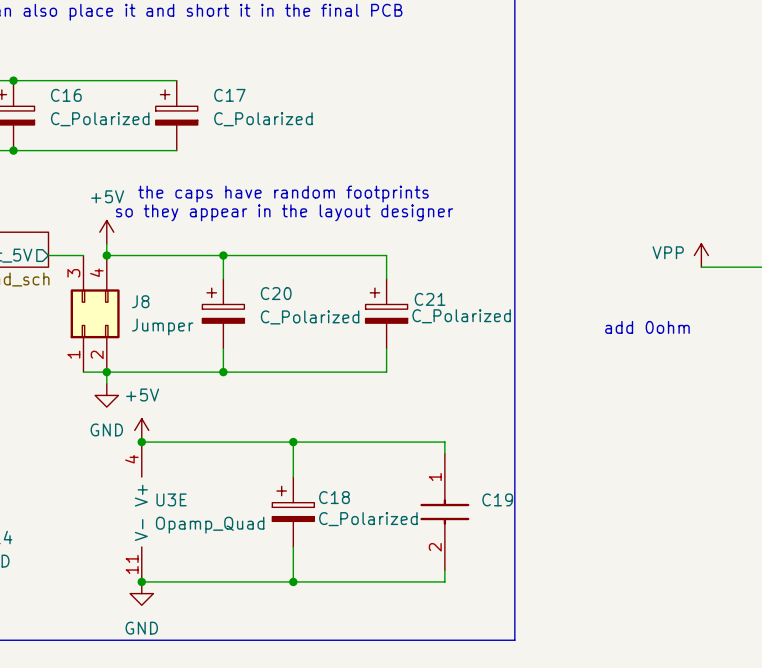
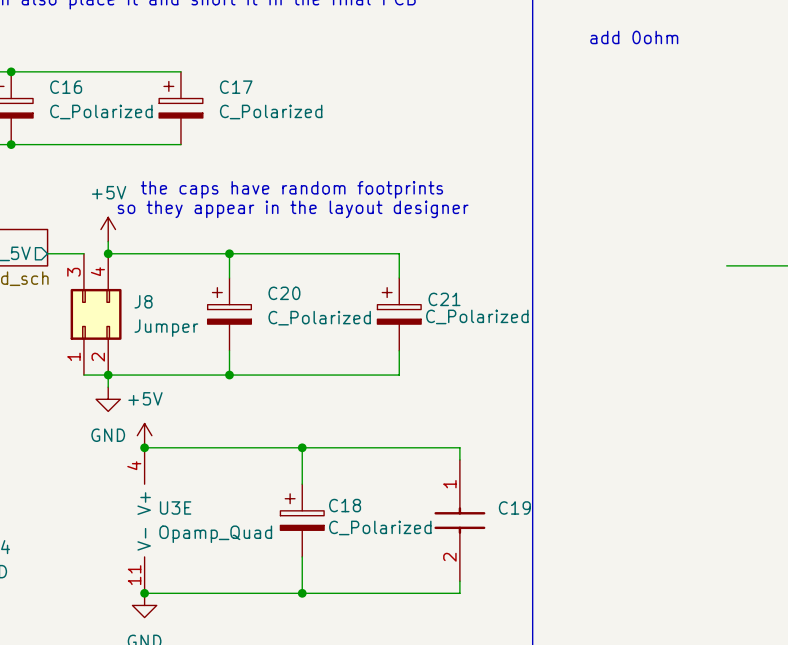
text: none -> add 0ohm (634, 37)
power symbol: VPP (701, 255) -> none
text: add 0ohm (647, 327) -> none

